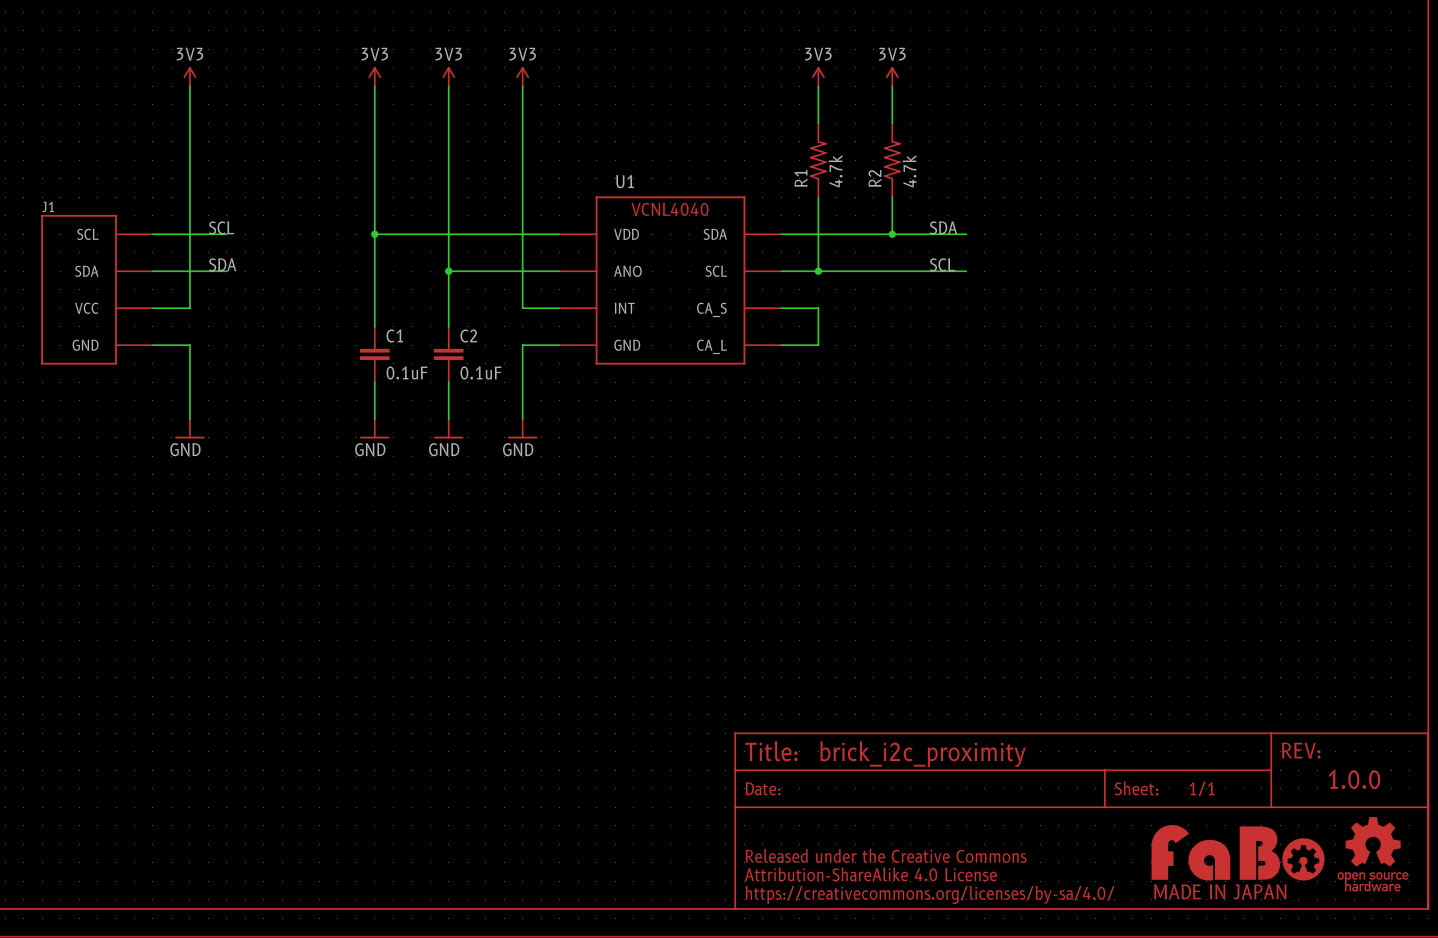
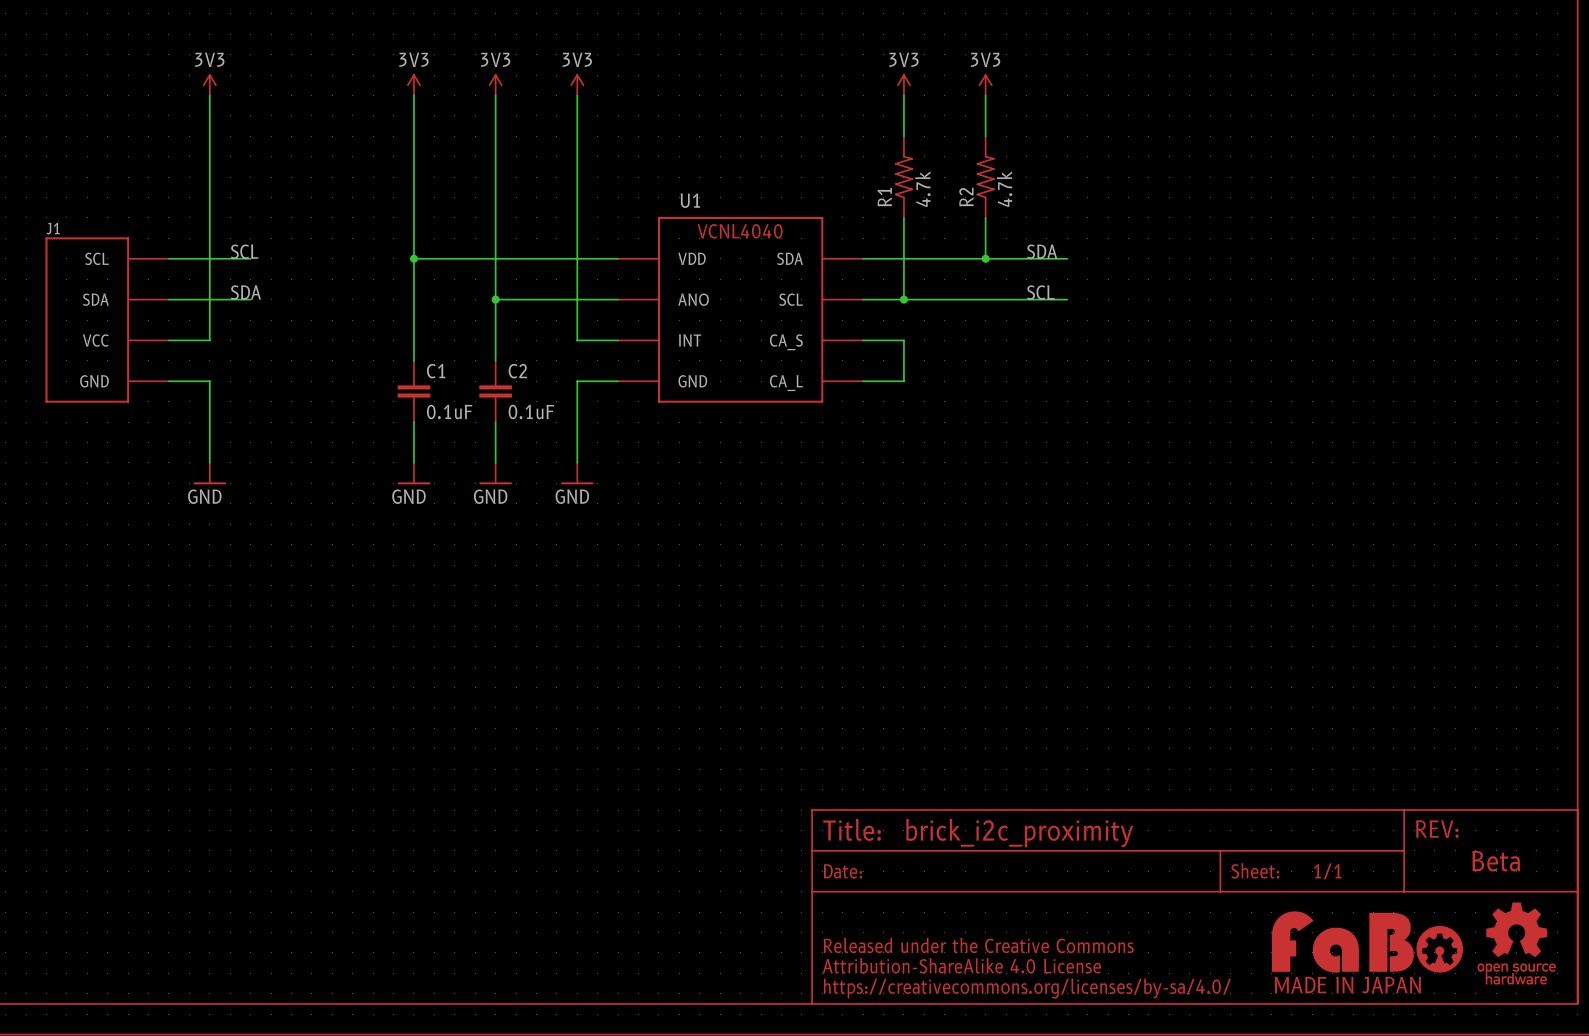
text: 1.0.0 (1354, 779) -> Beta (1496, 861)

